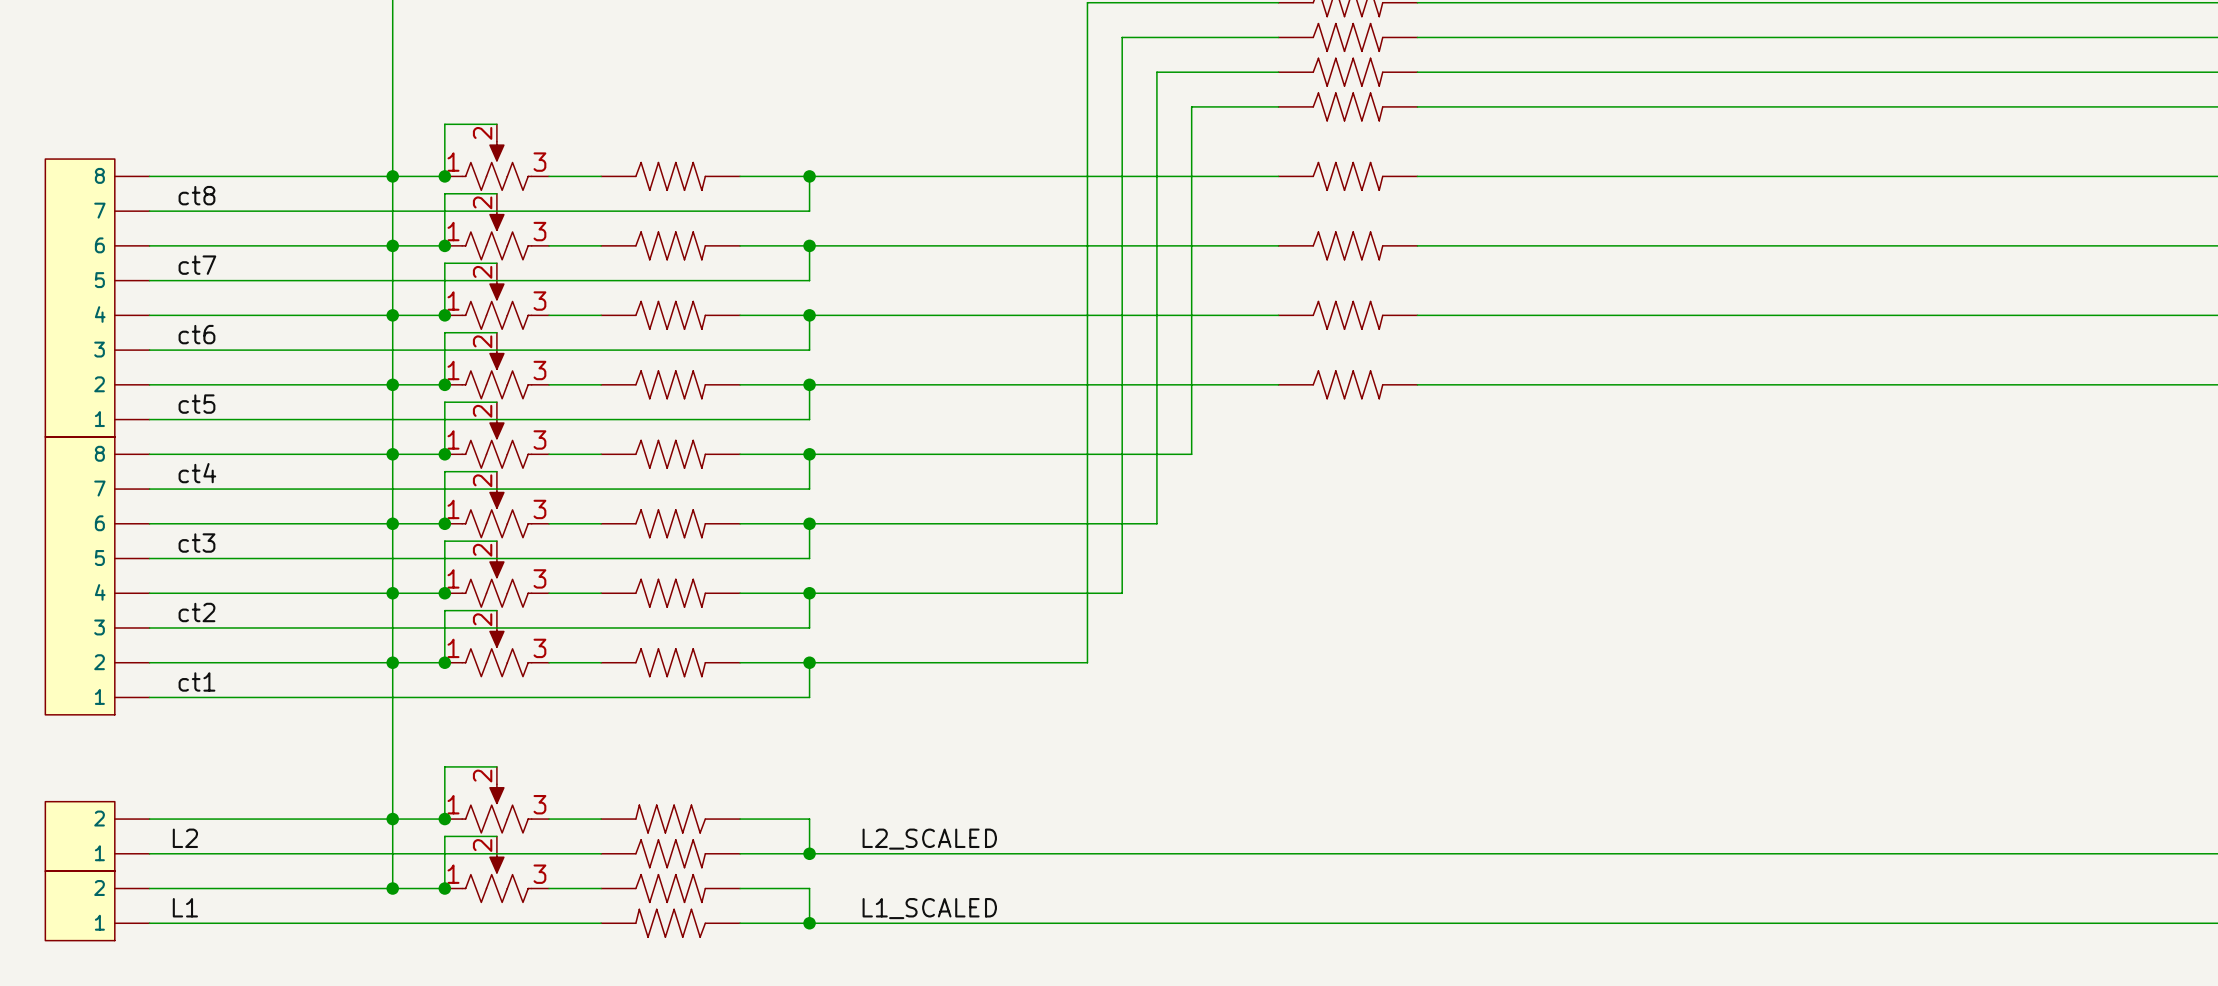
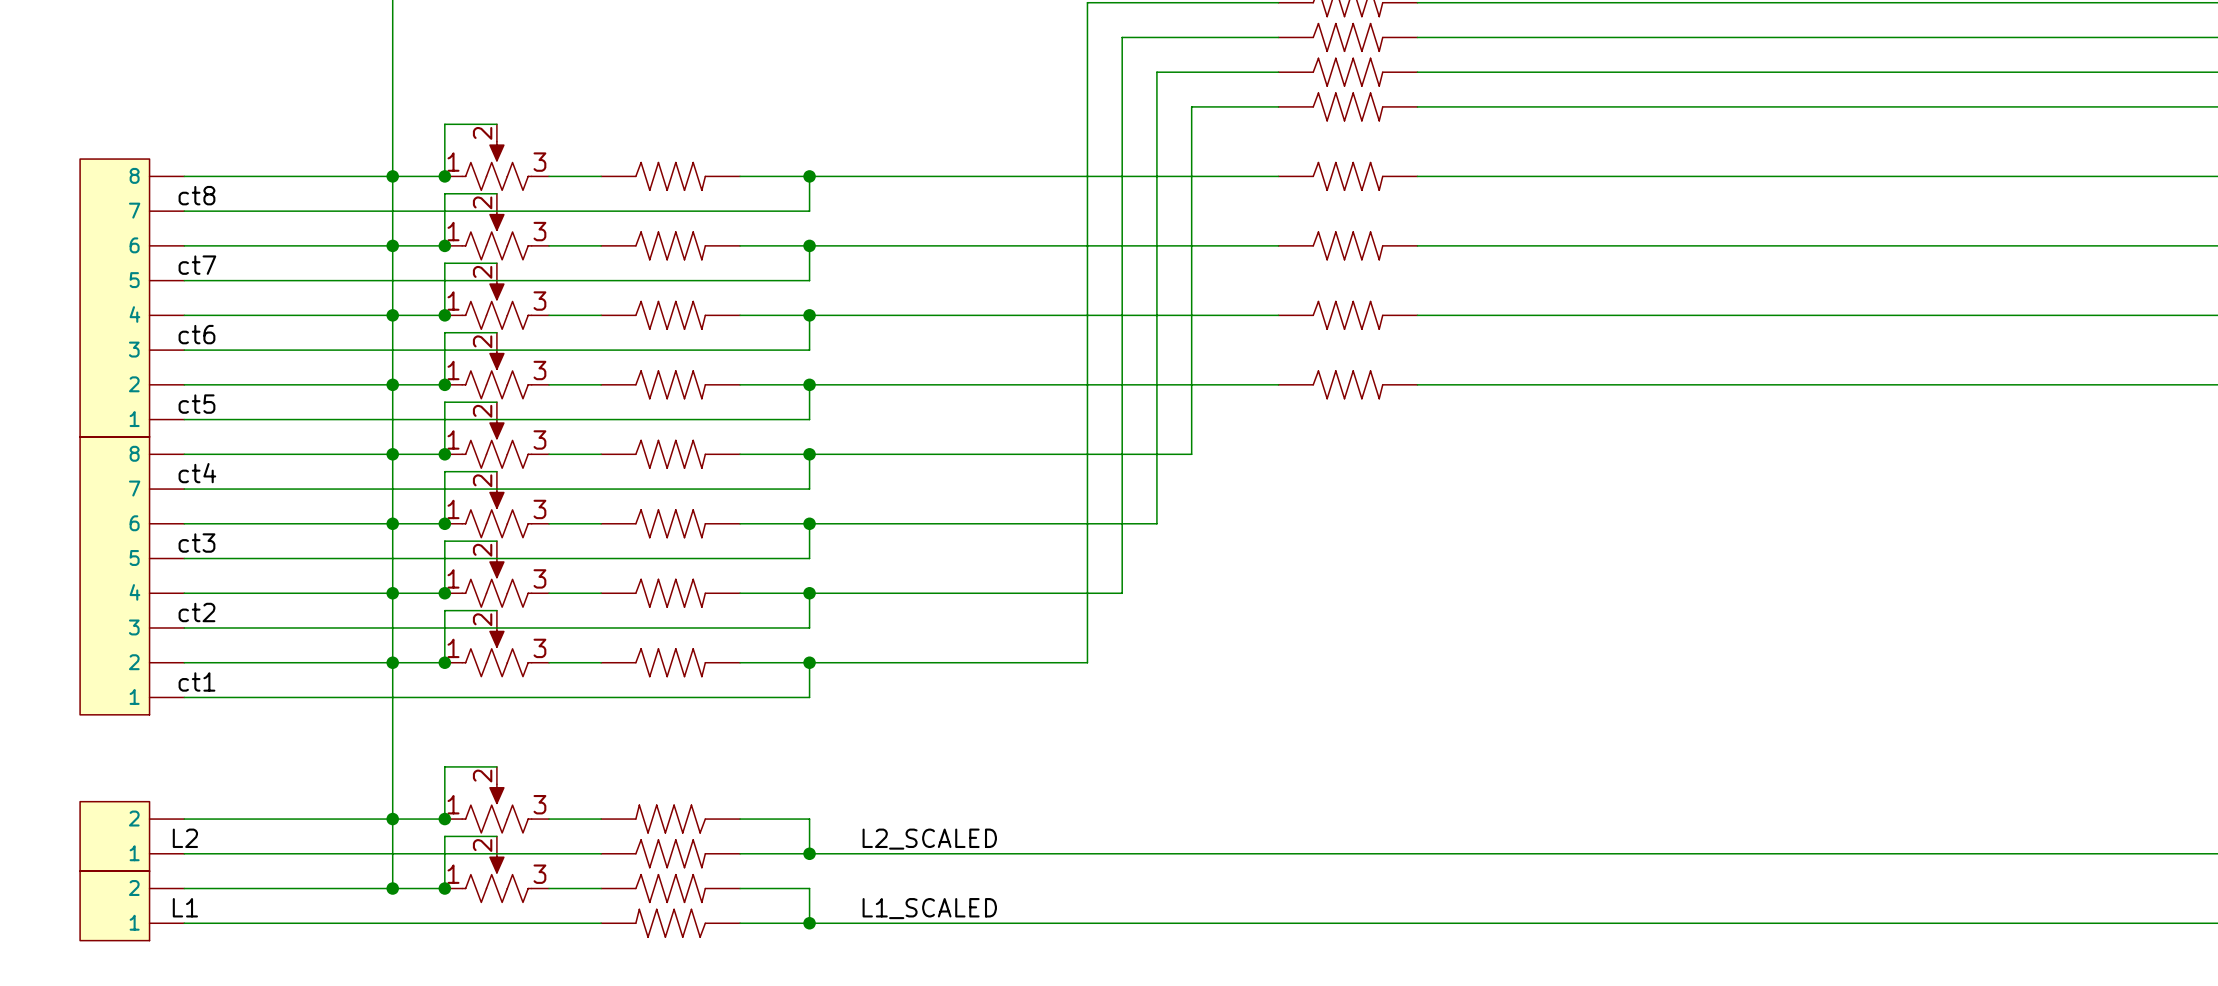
part position: (97, 297) -> (132, 297)
part position: (97, 575) -> (132, 575)
part position: (97, 836) -> (132, 836)
part position: (97, 905) -> (132, 905)

